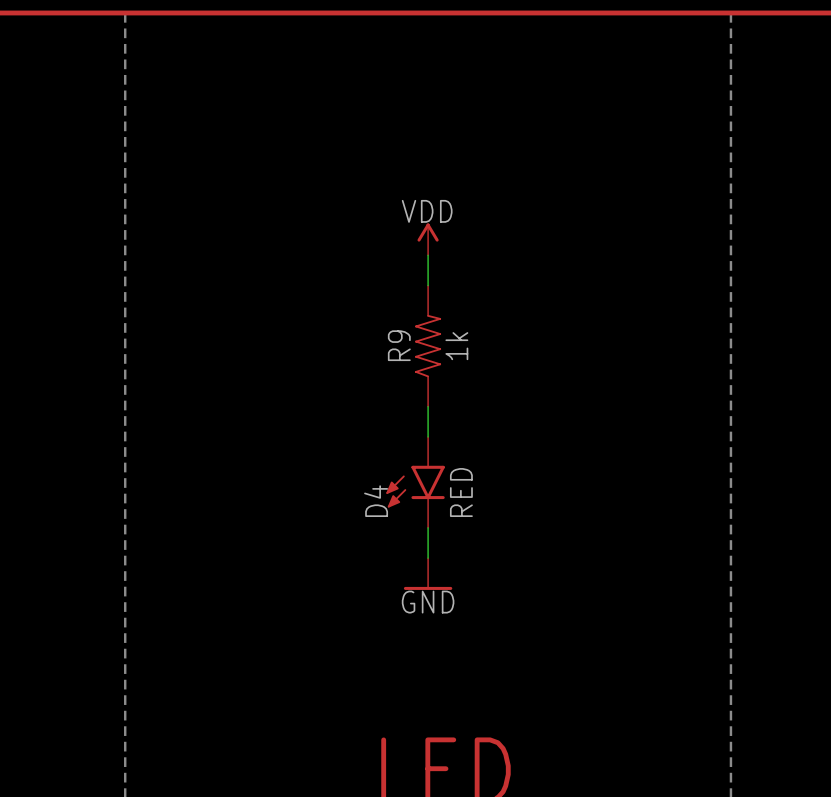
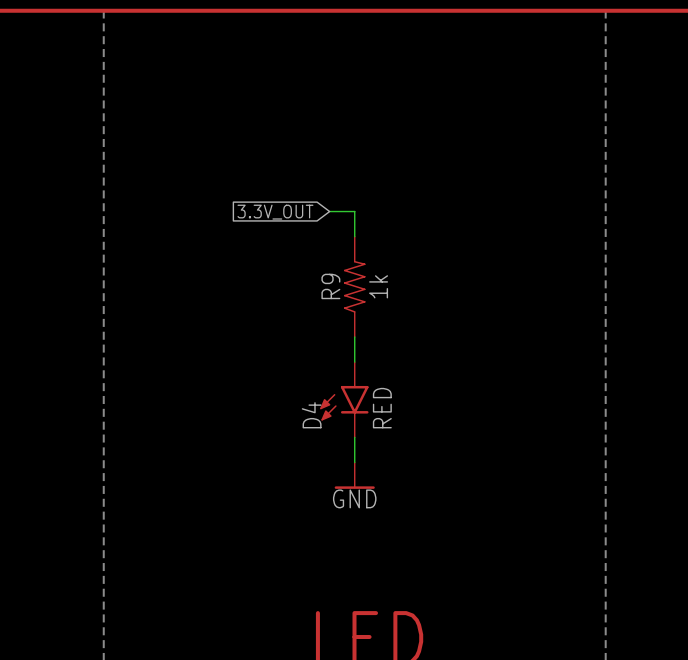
power symbol: VDD (428, 239) -> none
wire: none -> (329, 211) (354, 211)
global label: none -> 3.3V_OUT (275, 212)

